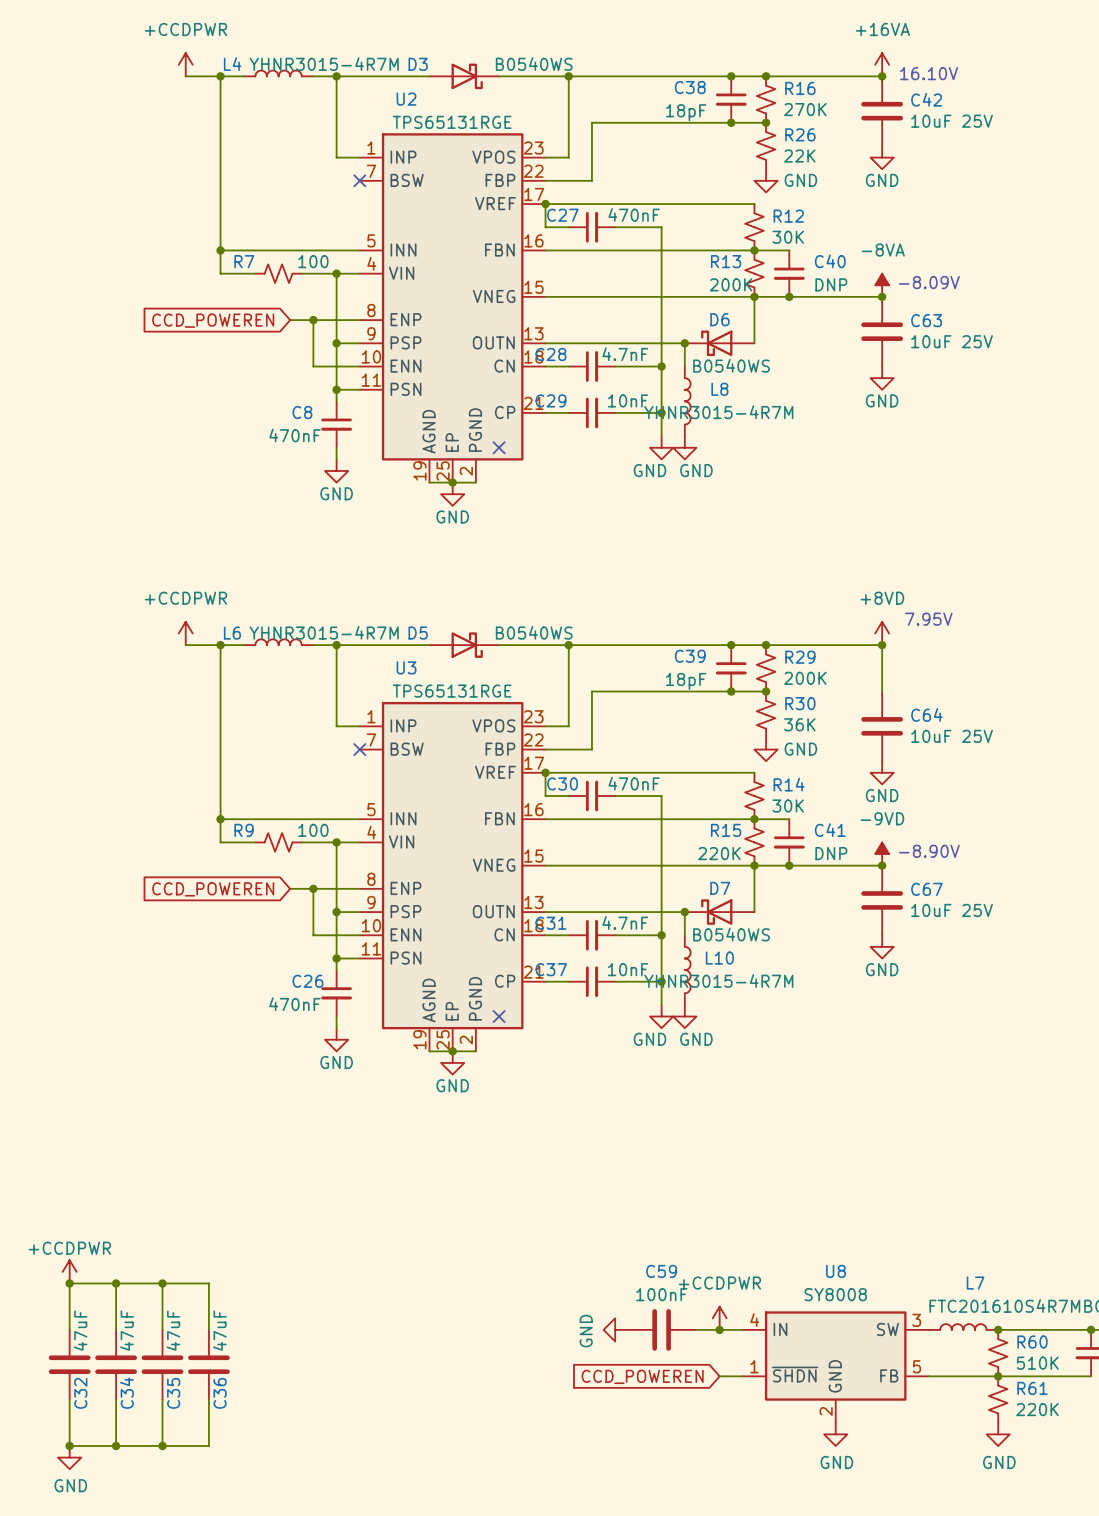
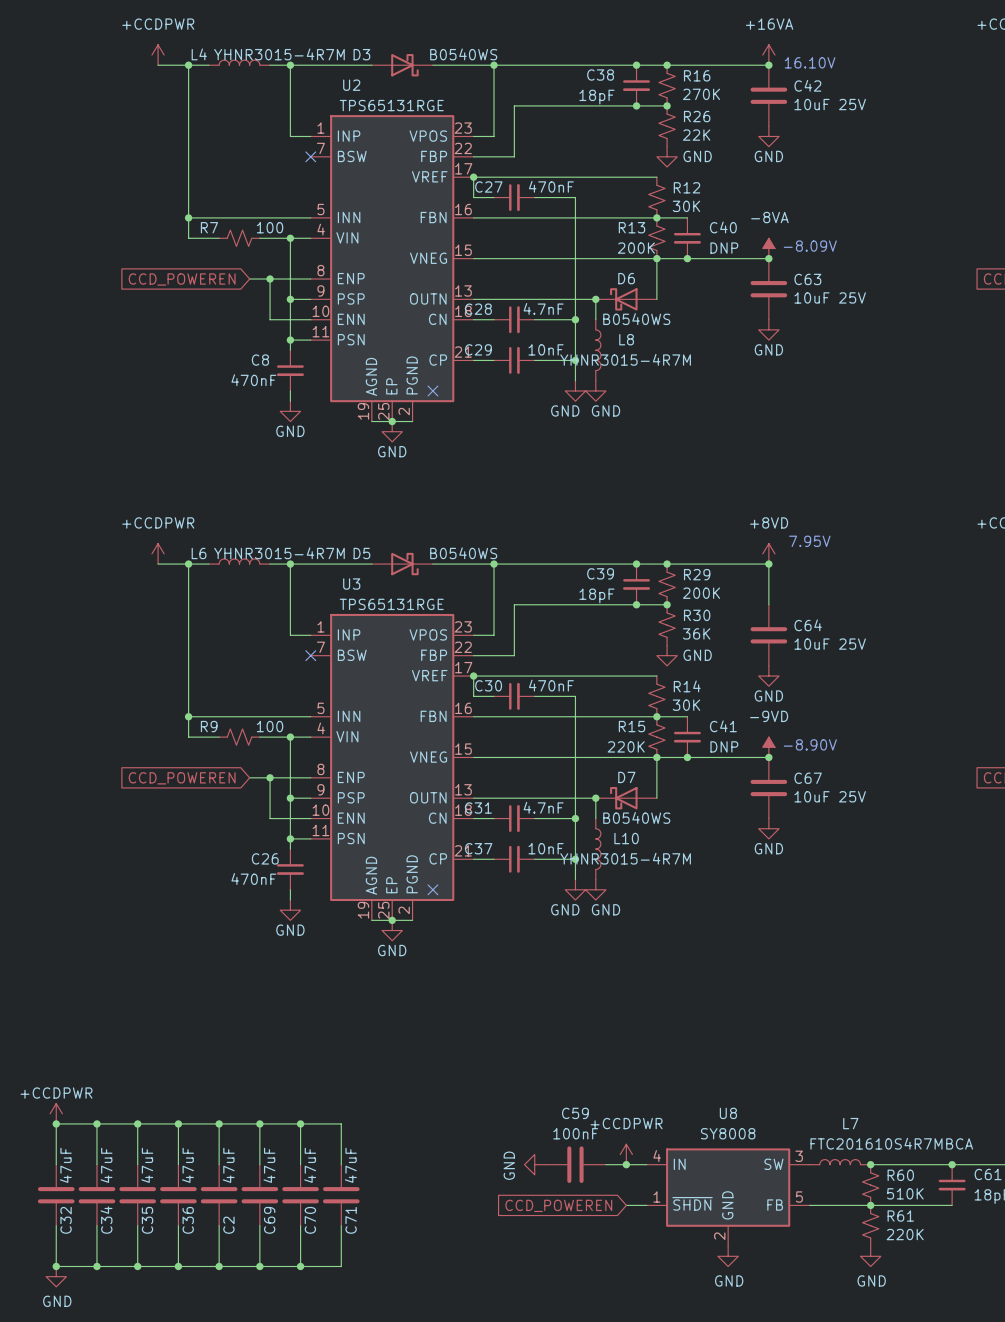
wire: none -> (178, 1123) (341, 1123) (341, 1164)
junction: none -> (178, 1123)
wire: none -> (219, 1123) (219, 1164)
junction: none -> (219, 1123)
wire: none -> (259, 1123) (259, 1164)
junction: none -> (259, 1123)
wire: none -> (300, 1123) (300, 1164)
junction: none -> (300, 1123)
C2: none -> 47uF (219, 1195)
C69: none -> 47uF (259, 1195)
C70: none -> 47uF (300, 1195)
C71: none -> 47uF (341, 1195)
wire: none -> (219, 1225) (219, 1266)
wire: none -> (259, 1225) (259, 1266)
wire: none -> (300, 1225) (300, 1266)
wire: none -> (341, 1225) (341, 1266) (178, 1266)
junction: none -> (178, 1266)
junction: none -> (219, 1266)
junction: none -> (259, 1266)
junction: none -> (300, 1266)

